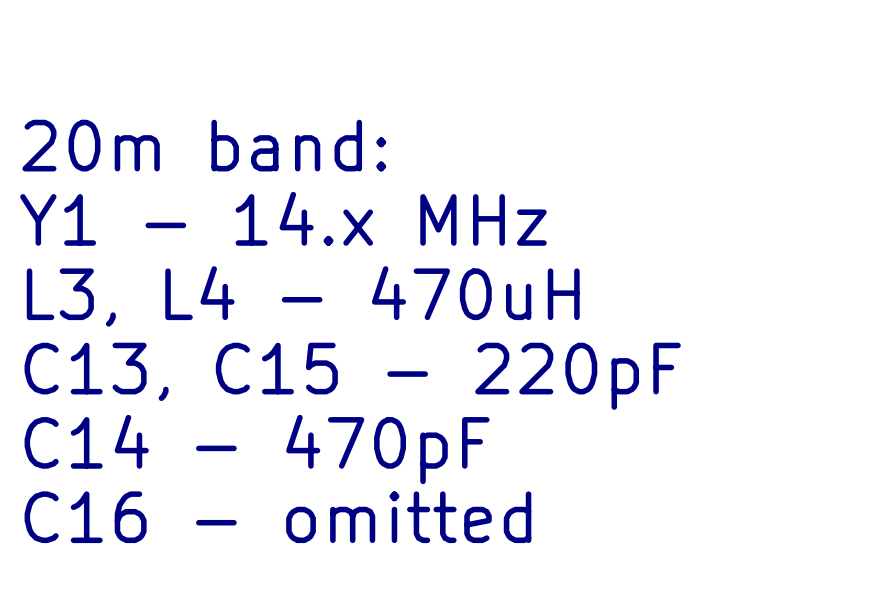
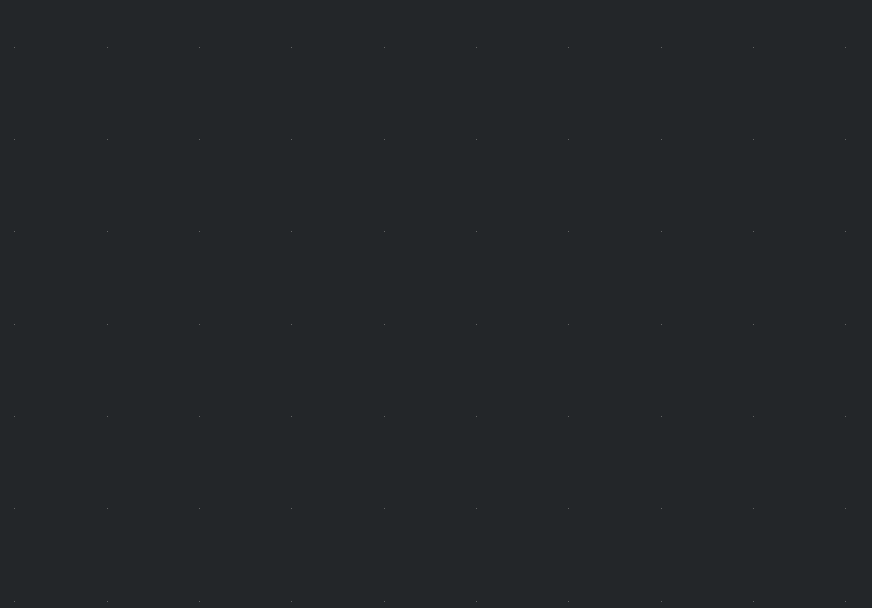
text: 20m band: (204, 145) -> none
text: Y1 - 14.x MHz (283, 218) -> none
text: L3, L4 - 470uH (303, 296) -> none
text: C13, C15 - 220pF (352, 376) -> none
text: C14 - 470pF (257, 449) -> none
text: C16 - omitted (277, 517) -> none

